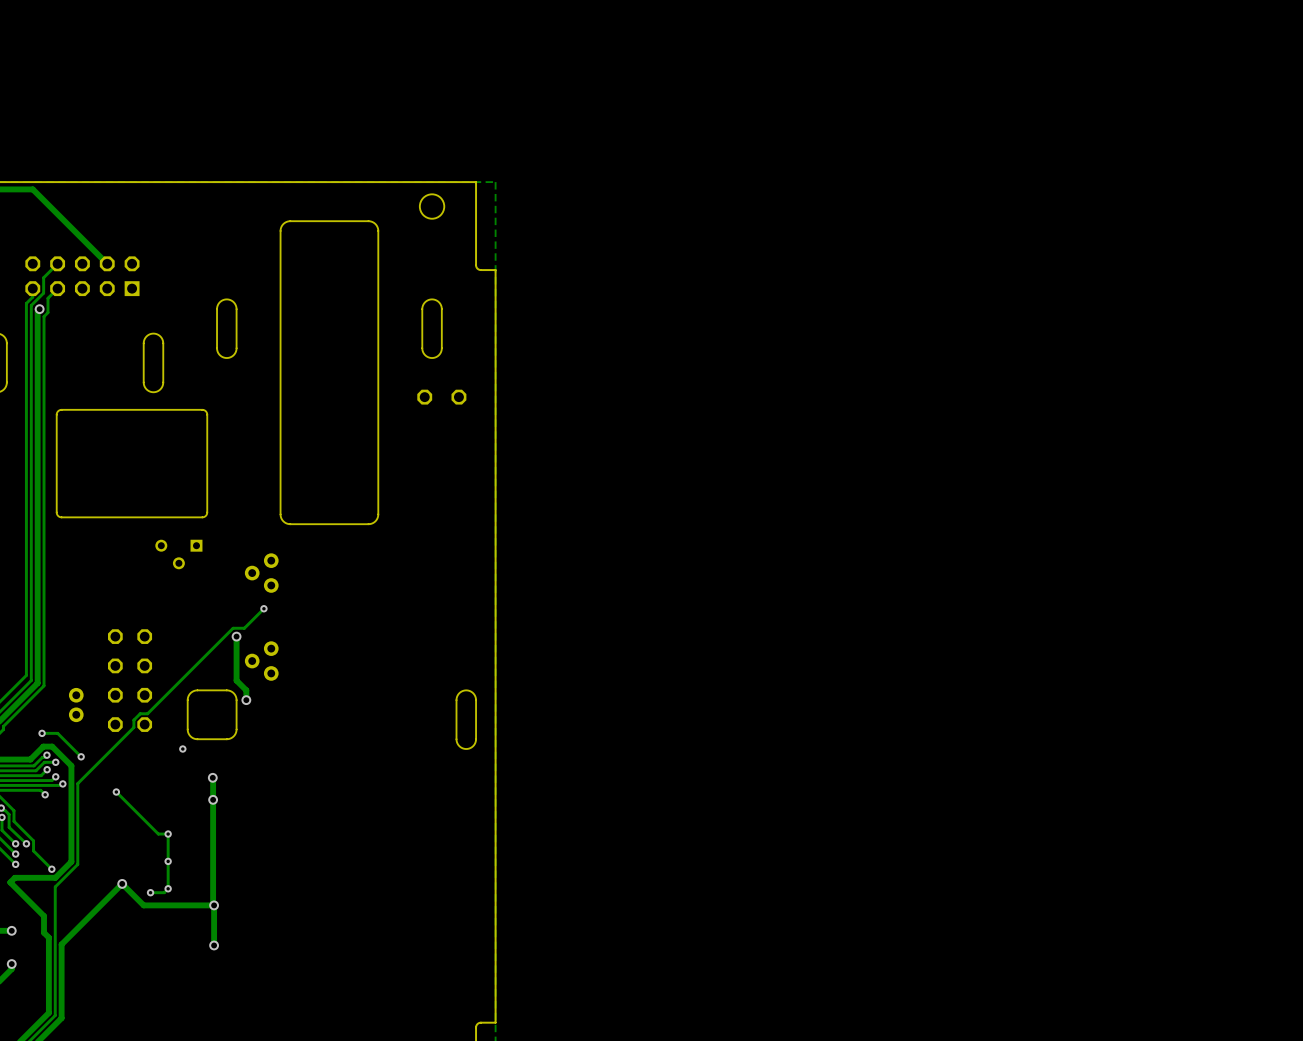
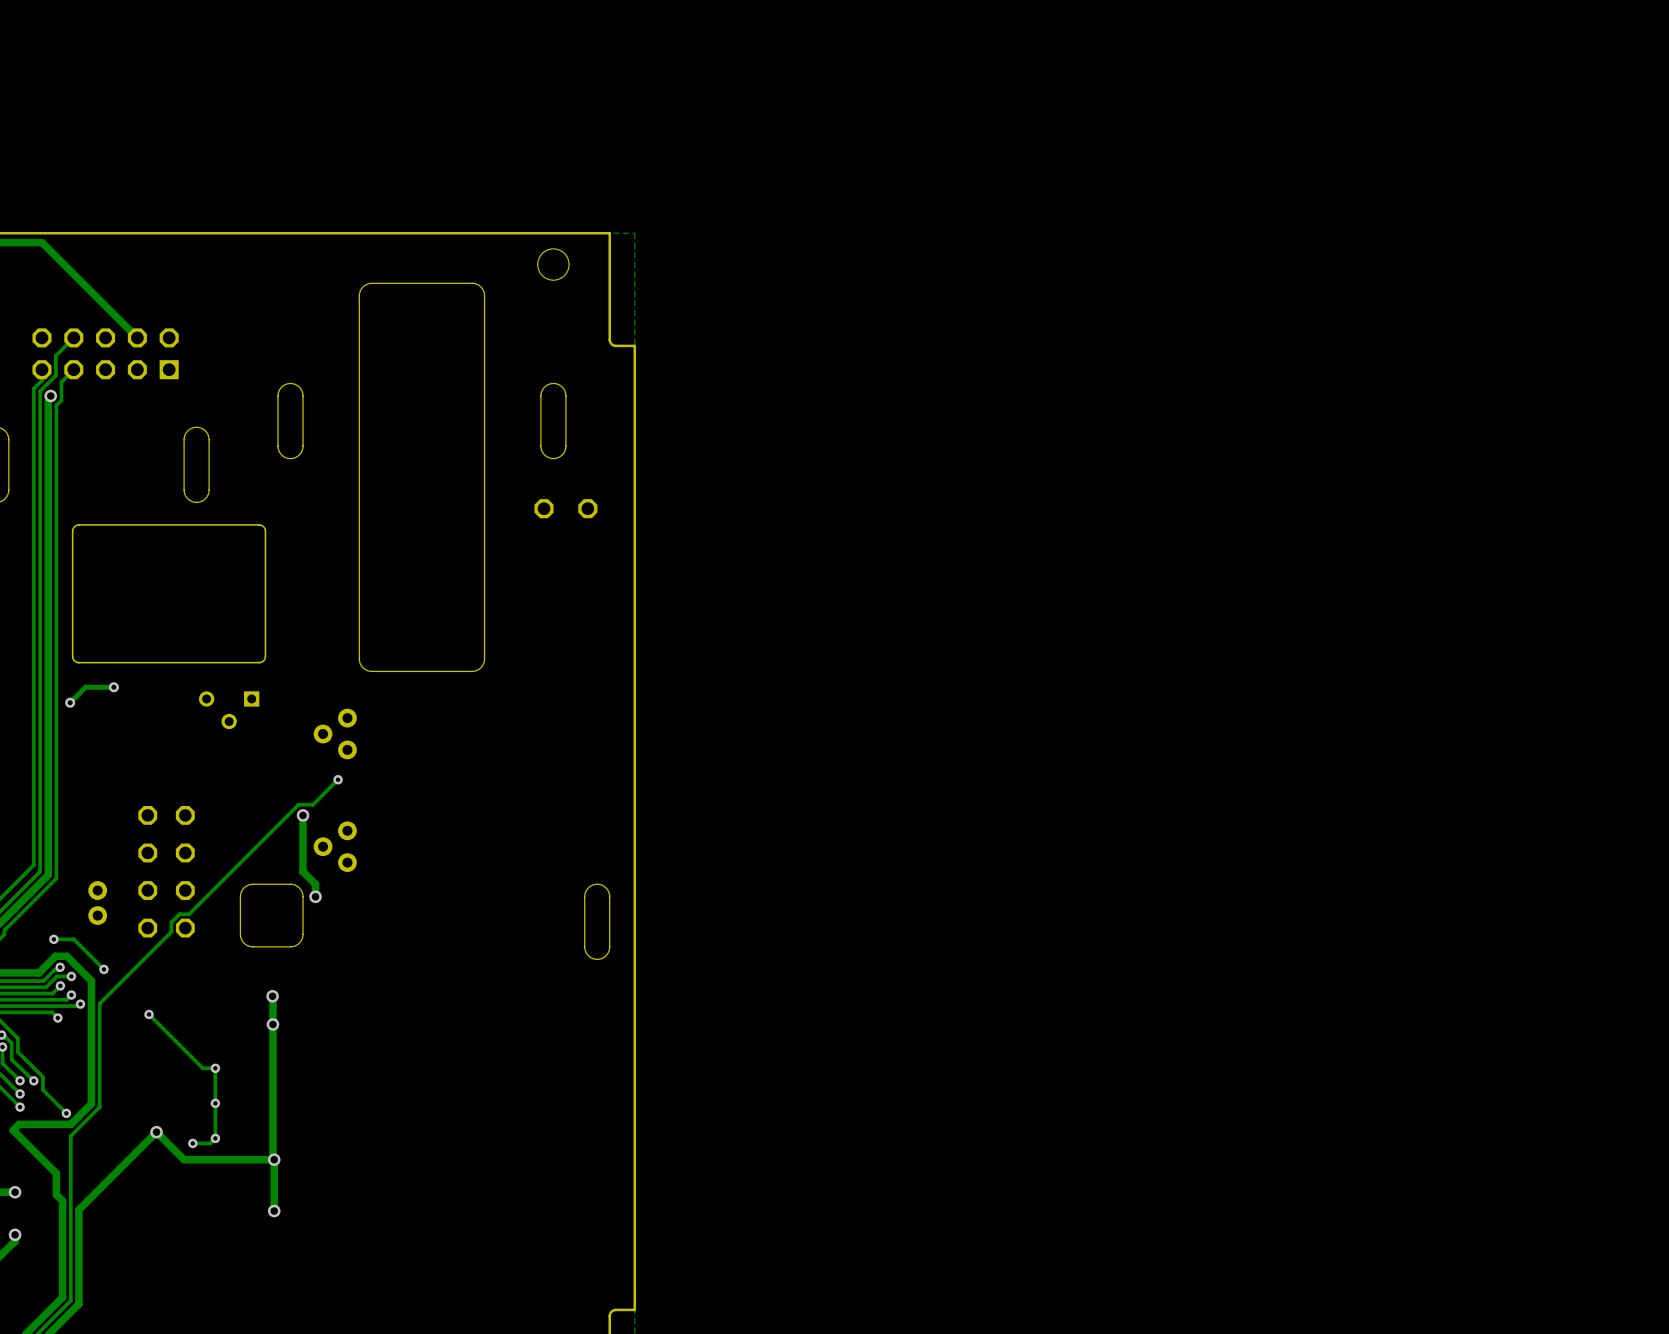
track: none -> (113, 687) (85, 687) (70, 702)
via: none -> (113, 687)
via: none -> (70, 702)
via: (182, 749) -> none

